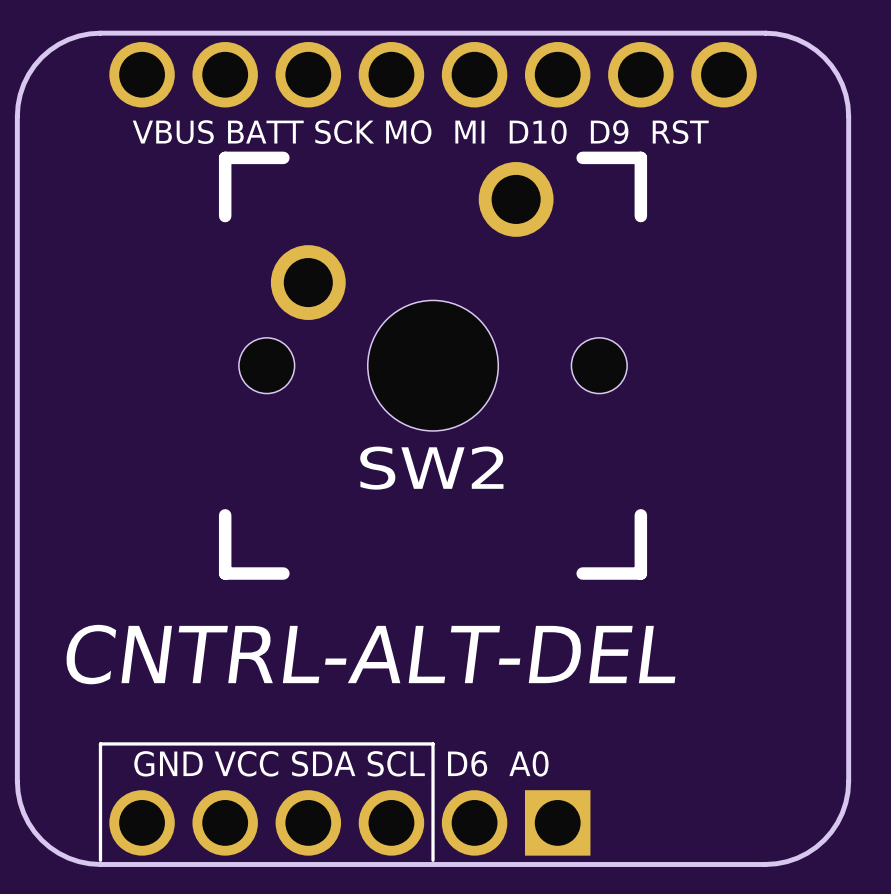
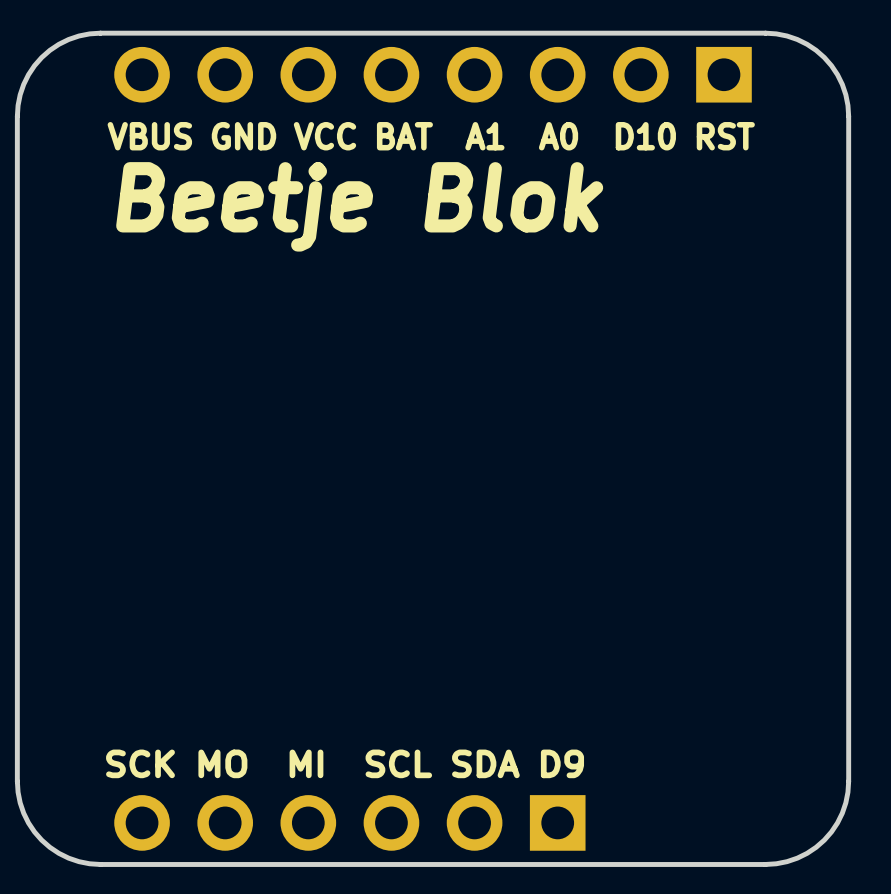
part footprint: [109, 42, 757, 108] -> [114, 46, 752, 103]
text: none -> VBUS GND VCC BAT A1 A0 D10 RST (431, 136)
text: none -> Beetje Blok (359, 206)
SW2: (433, 365) -> none
text: CNTRL-ALT-DEL (370, 654) -> none
part footprint: [98, 742, 591, 862] -> [114, 795, 586, 851]
text: none -> SCK MO MI SCL SDA D9 (345, 763)

